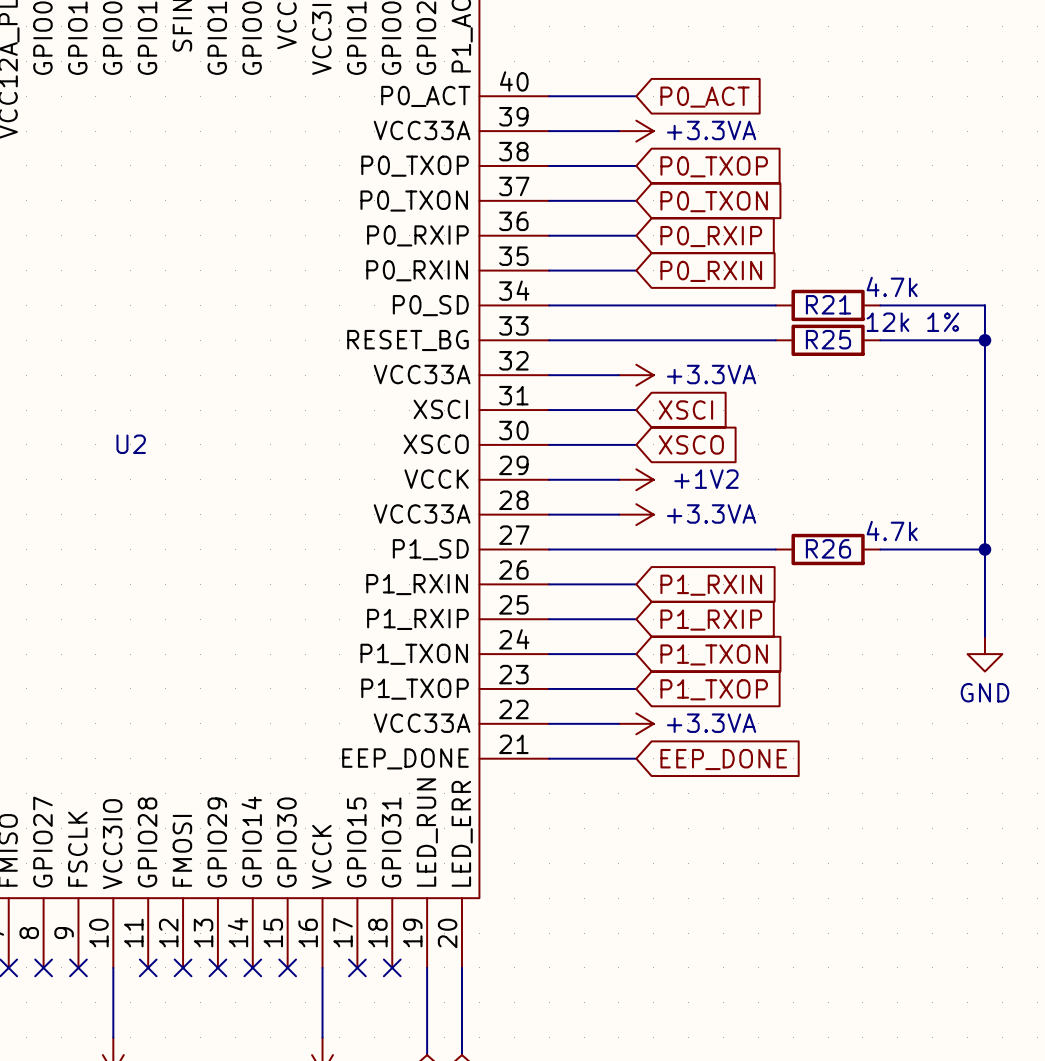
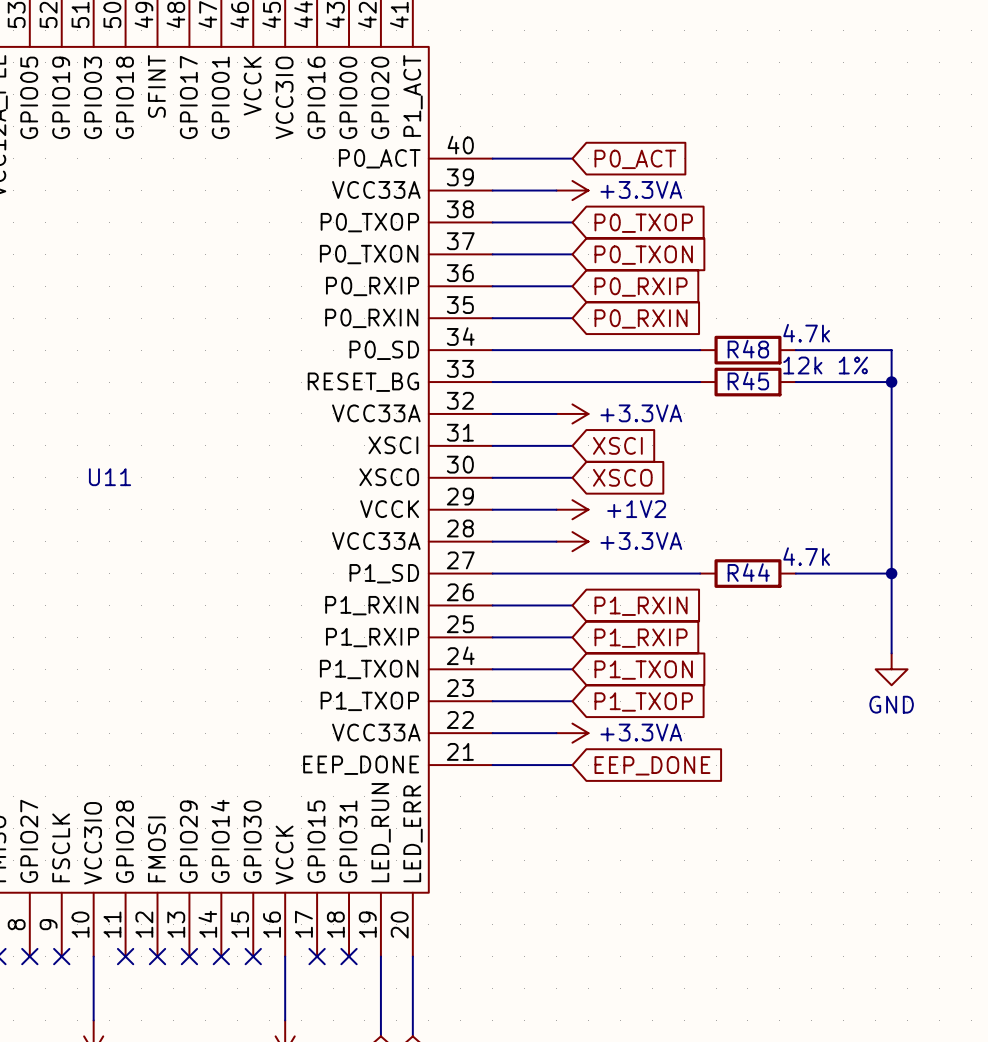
R21 name: R21 (828, 304) -> R48 (748, 349)
R25 name: R25 (828, 339) -> R45 (748, 381)
U2 name: U2 (131, 444) -> U11 (110, 477)
R26 name: R26 (828, 548) -> R44 (748, 572)

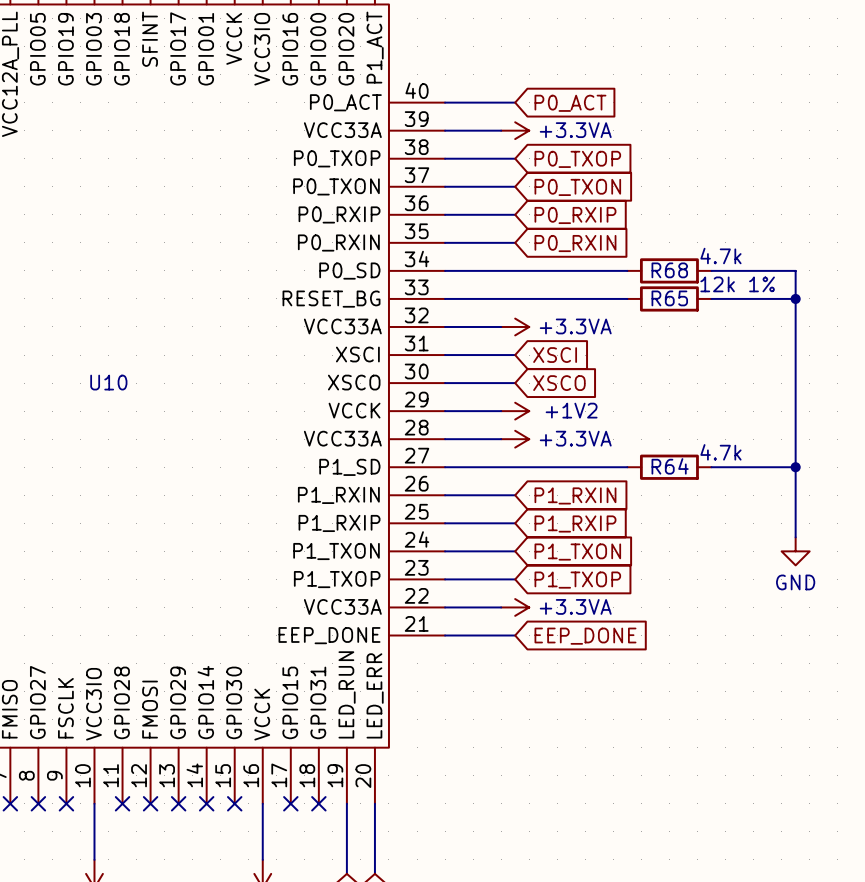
R48 name: R48 (748, 349) -> R68 (669, 270)
R45 name: R45 (748, 381) -> R65 (669, 298)
U11 name: U11 (110, 477) -> U10 (108, 382)
R44 name: R44 (748, 572) -> R64 (670, 466)

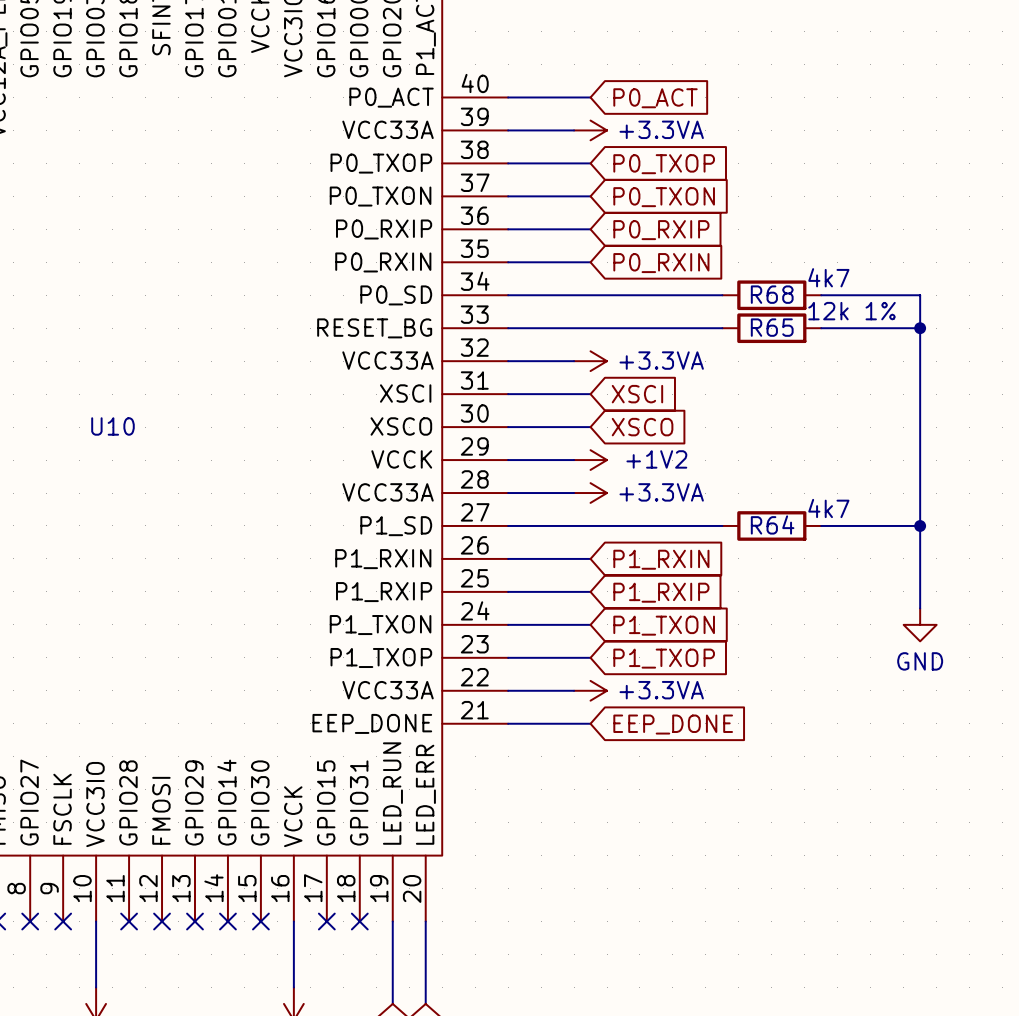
R68 value: 4.7k (720, 256) -> 4k7 (828, 277)
R64 value: 4.7k (720, 452) -> 4k7 (828, 508)

